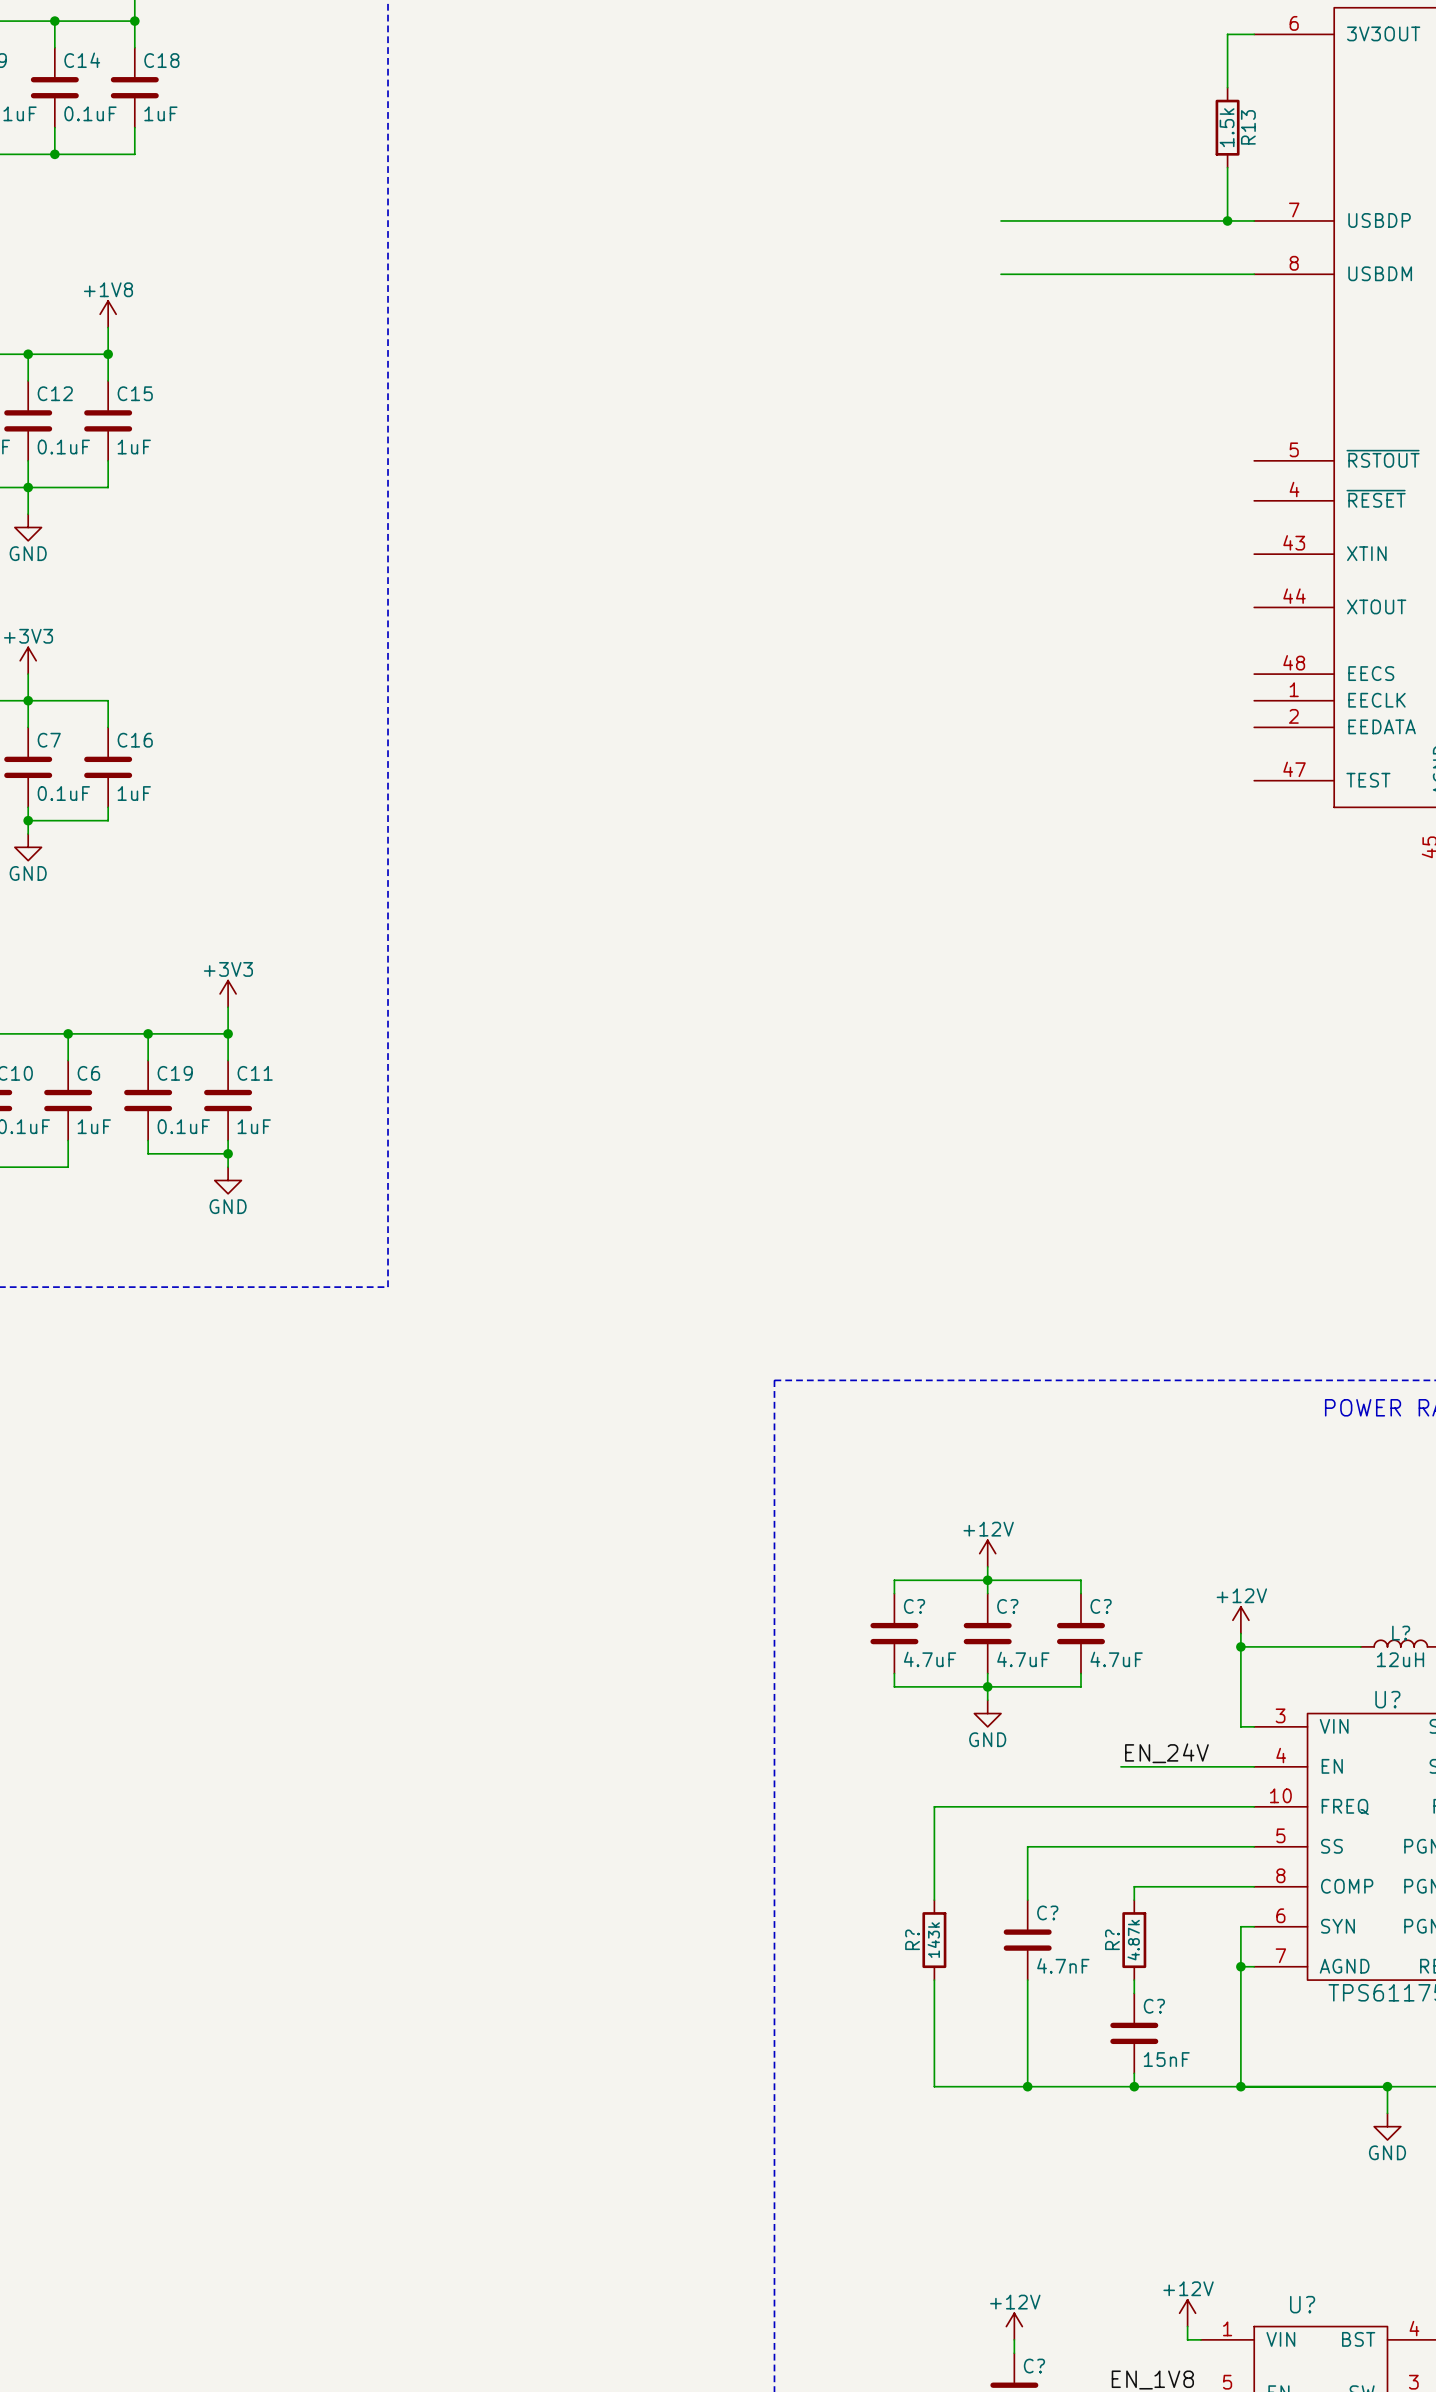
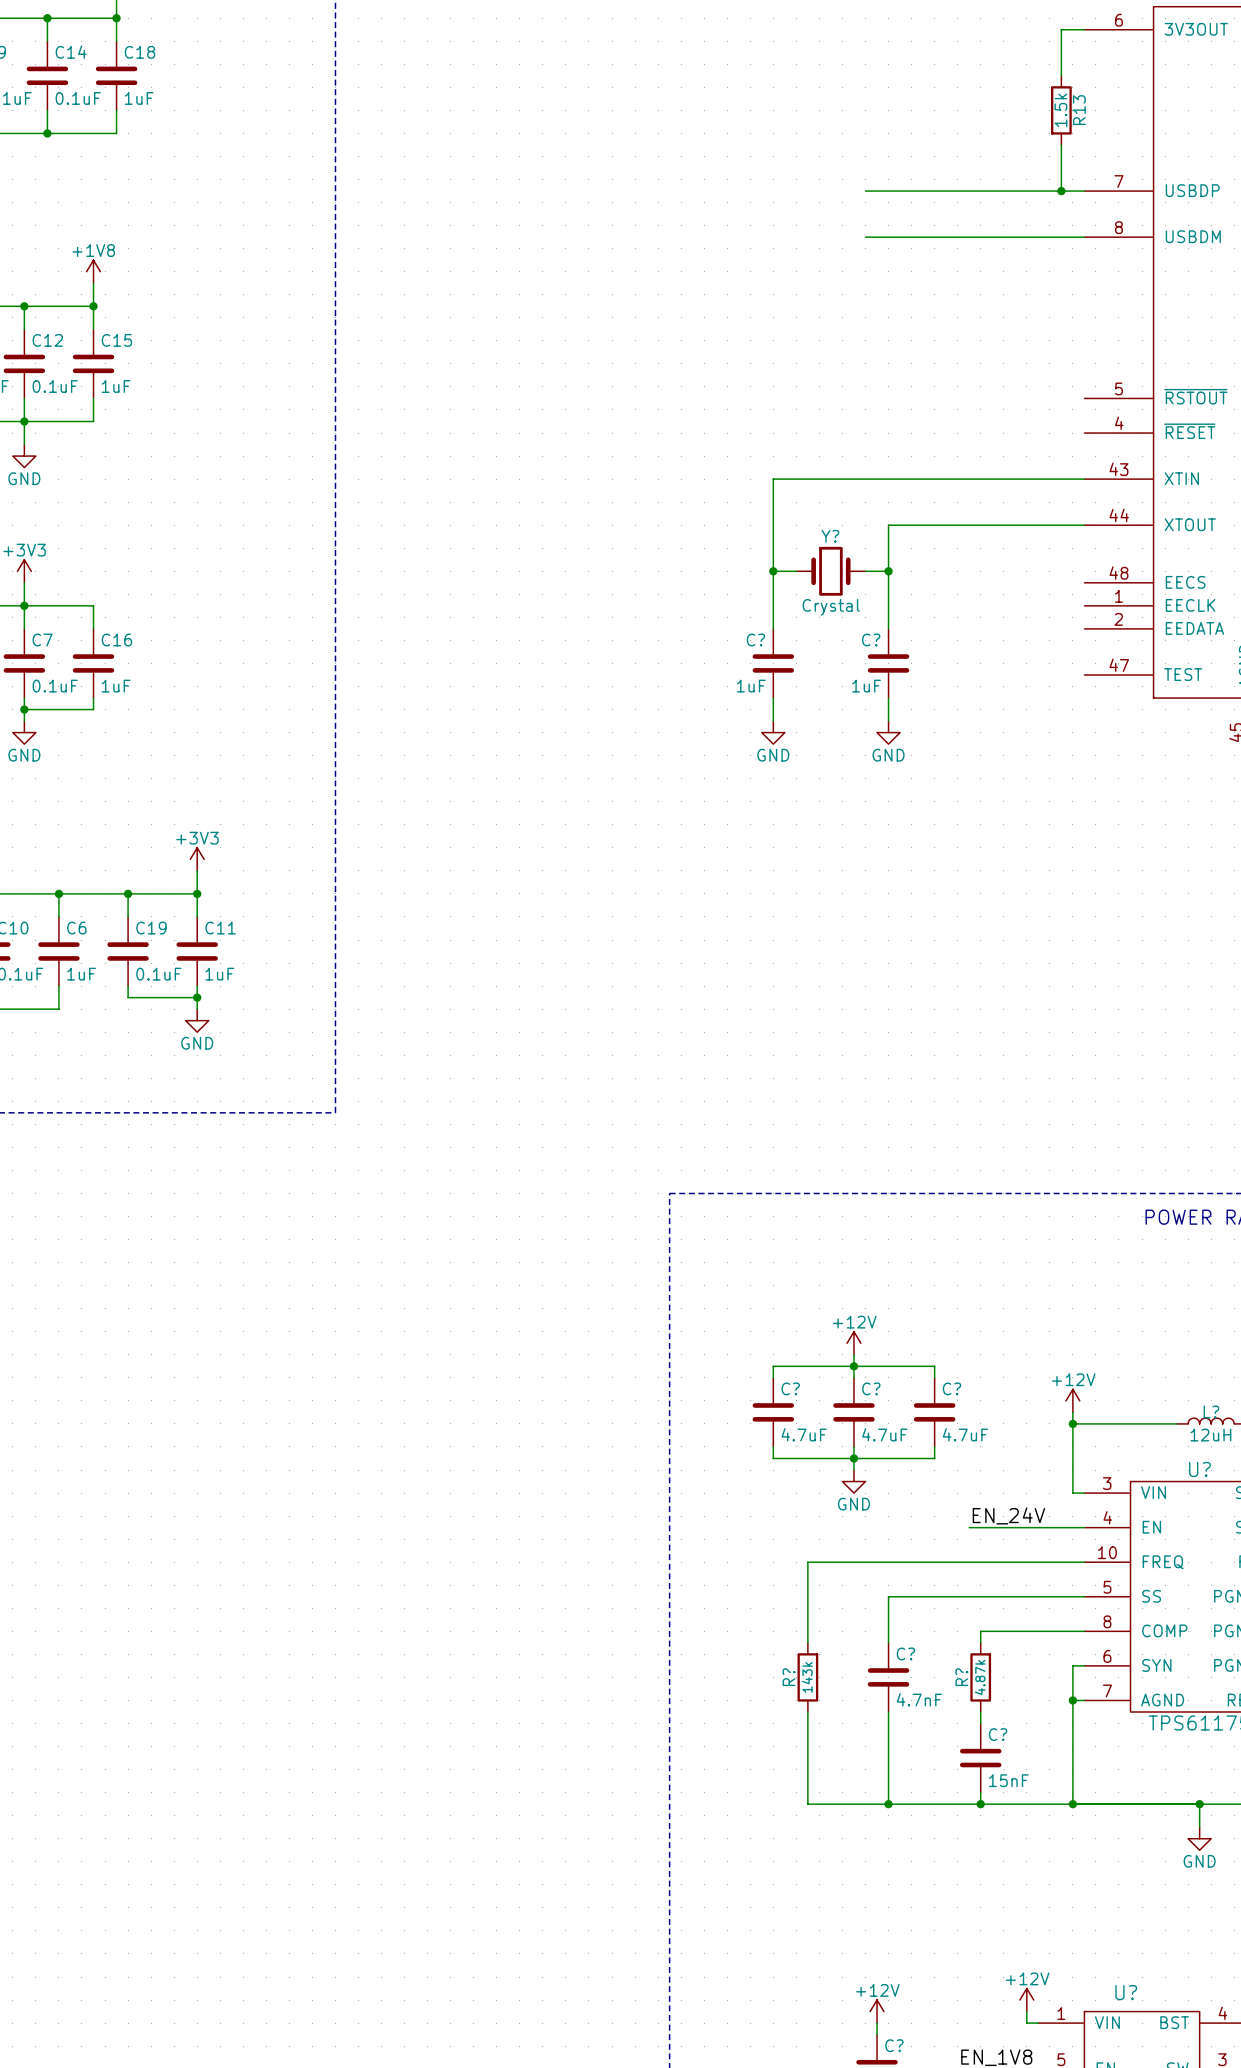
wire: none -> (1084, 479) (773, 479) (773, 628)
wire: none -> (1084, 525) (888, 525) (888, 628)
wire: none -> (773, 571) (796, 571)
junction: none -> (773, 571)
Y?: none -> Crystal (830, 571)
wire: none -> (865, 571) (888, 571)
junction: none -> (888, 571)
C?: none -> 1uF (773, 663)
C?: none -> 1uF (888, 663)
wire: none -> (773, 698) (773, 721)
wire: none -> (888, 698) (888, 721)
power symbol: none -> GND (773, 732)
power symbol: none -> GND (888, 732)

